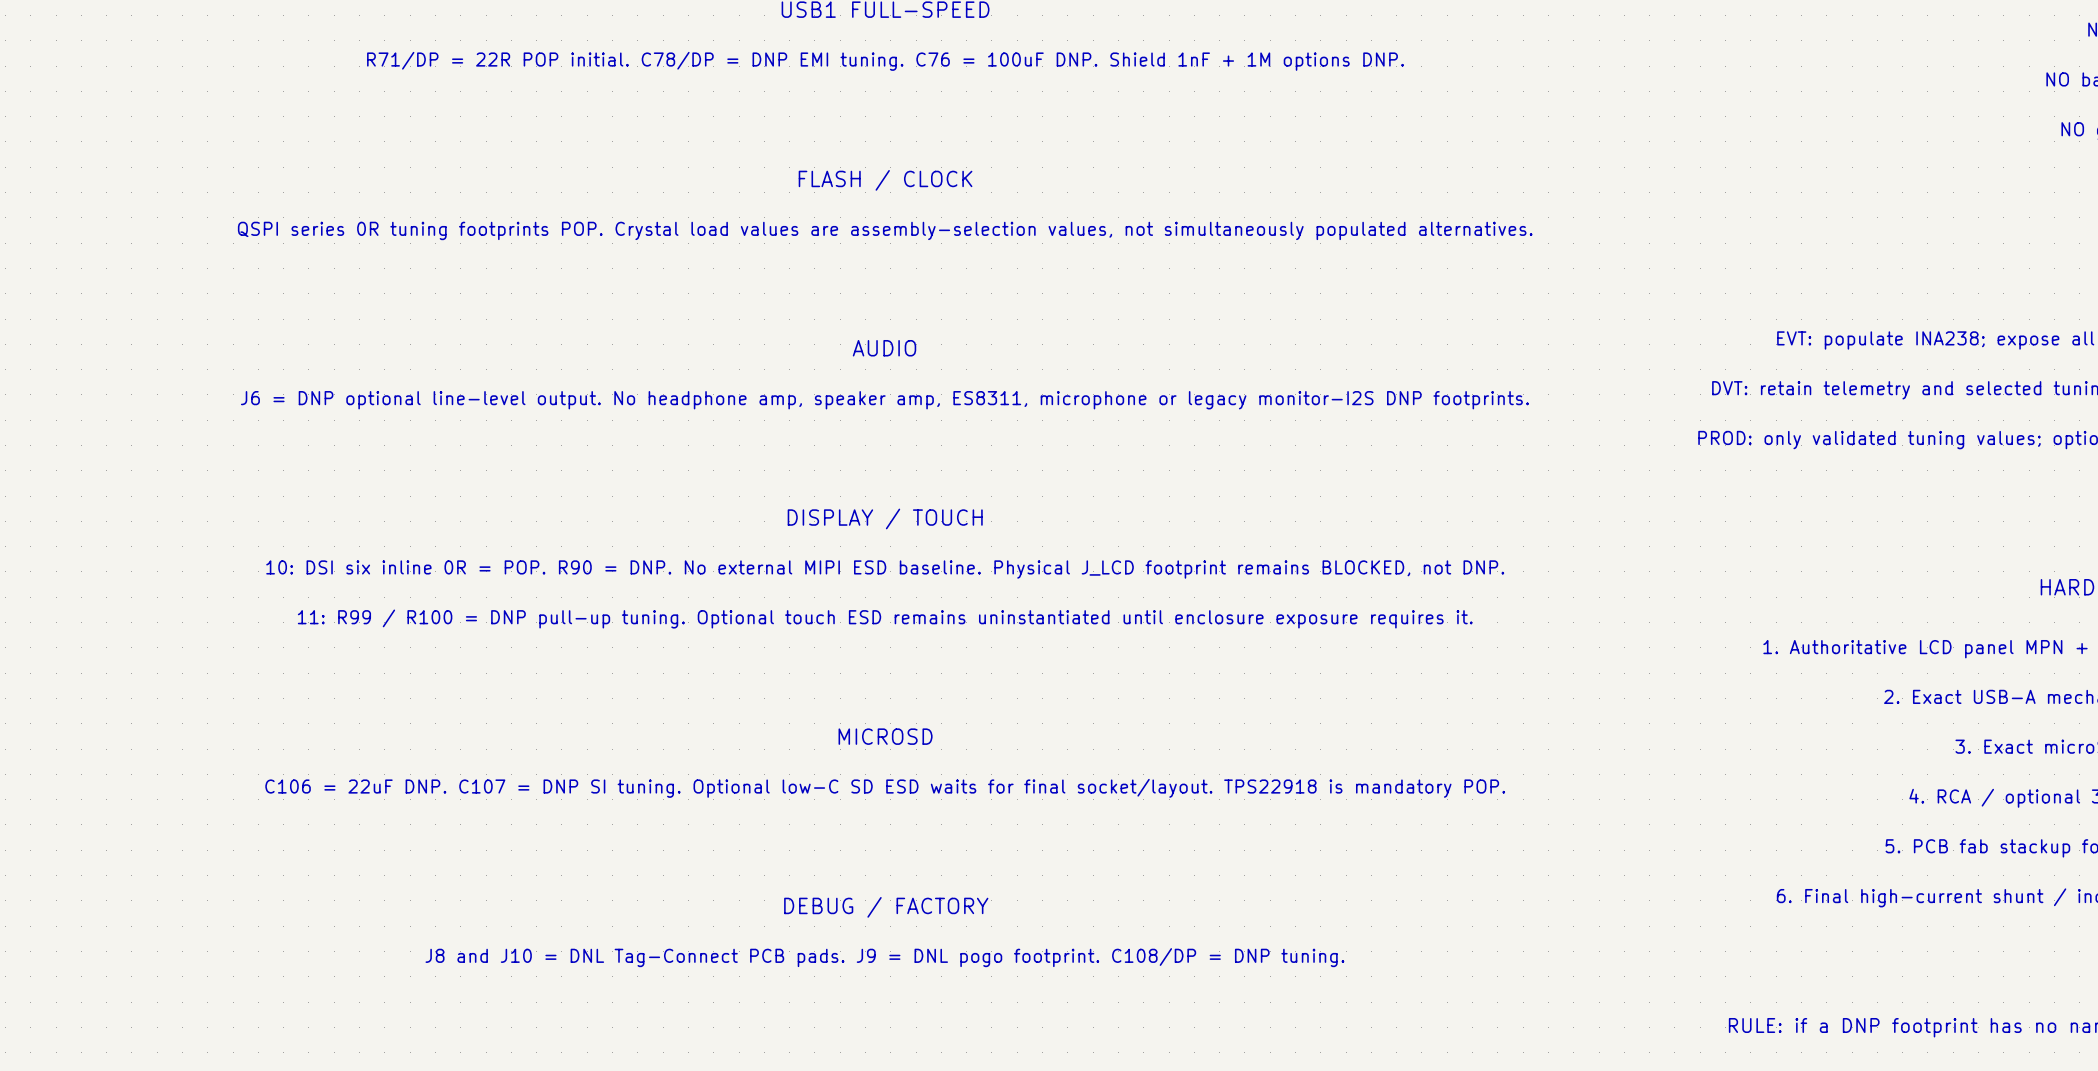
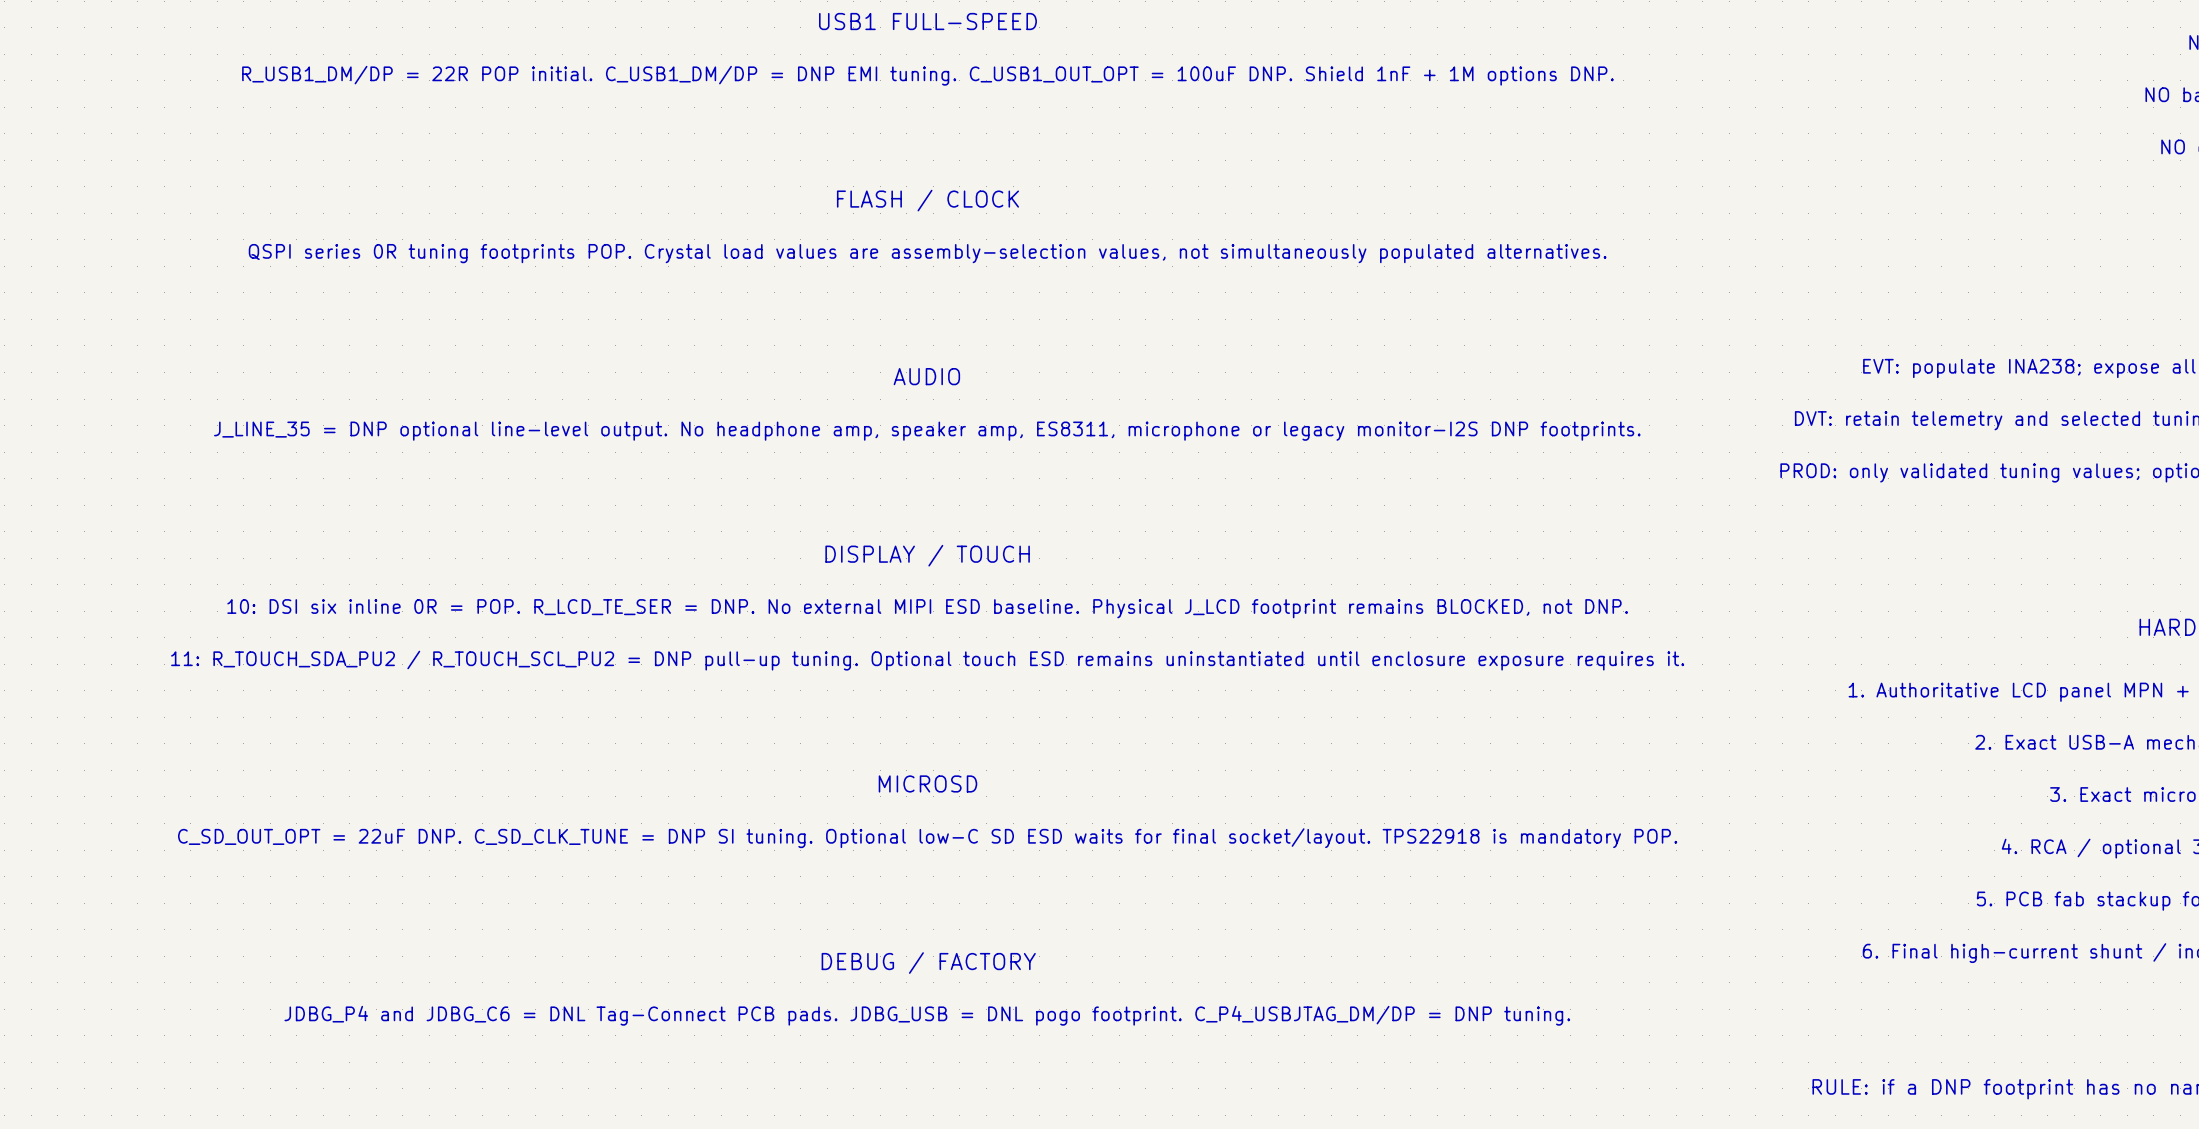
text: R71/DP = 22R POP initial. C78/DP = DNP EMI tuning. C76 = 100uF DNP. Shield 1nF + 1M options DNP. (885, 61) -> R_USB1_DM/DP = 22R POP initial. C_USB1_DM/DP = DNP EMI tuning. C_USB1_OUT_OPT = 100uF DNP. Shield 1nF + 1M options DNP. (927, 75)
text: J6 = DNP optional line-level output. No headphone amp, speaker amp, ES8311, microphone or legacy monitor-I2S DNP footprints. (884, 400) -> J_LINE_35 = DNP optional line-level output. No headphone amp, speaker amp, ES8311, microphone or legacy monitor-I2S DNP footprints. (927, 431)
text: 10: DSI six inline 0R = POP. R90 = DNP. No external MIPI ESD baseline. Physical J_LCD footprint remains BLOCKED, not DNP. (885, 569) -> 10: DSI six inline 0R = POP. R_LCD_TE_SER = DNP. No external MIPI ESD baseline. Physical J_LCD footprint remains BLOCKED, not DNP. (927, 608)
text: 11: R99 / R100 = DNP pull-up tuning. Optional touch ESD remains uninstantiated until enclosure exposure requires it. (885, 619) -> 11: R_TOUCH_SDA_PU2 / R_TOUCH_SCL_PU2 = DNP pull-up tuning. Optional touch ESD remains uninstantiated until enclosure exposure requires it. (927, 660)
text: C106 = 22uF DNP. C107 = DNP SI tuning. Optional low-C SD ESD waits for final socket/layout. TPS22918 is mandatory POP. (885, 788) -> C_SD_OUT_OPT = 22uF DNP. C_SD_CLK_TUNE = DNP SI tuning. Optional low-C SD ESD waits for final socket/layout. TPS22918 is mandatory POP. (927, 838)
text: J8 and J10 = DNL Tag-Connect PCB pads. J9 = DNL pogo footprint. C108/DP = DNP tuning. (884, 957) -> JDBG_P4 and JDBG_C6 = DNL Tag-Connect PCB pads. JDBG_USB = DNL pogo footprint. C_P4_USBJTAG_DM/DP = DNP tuning. (927, 1015)

